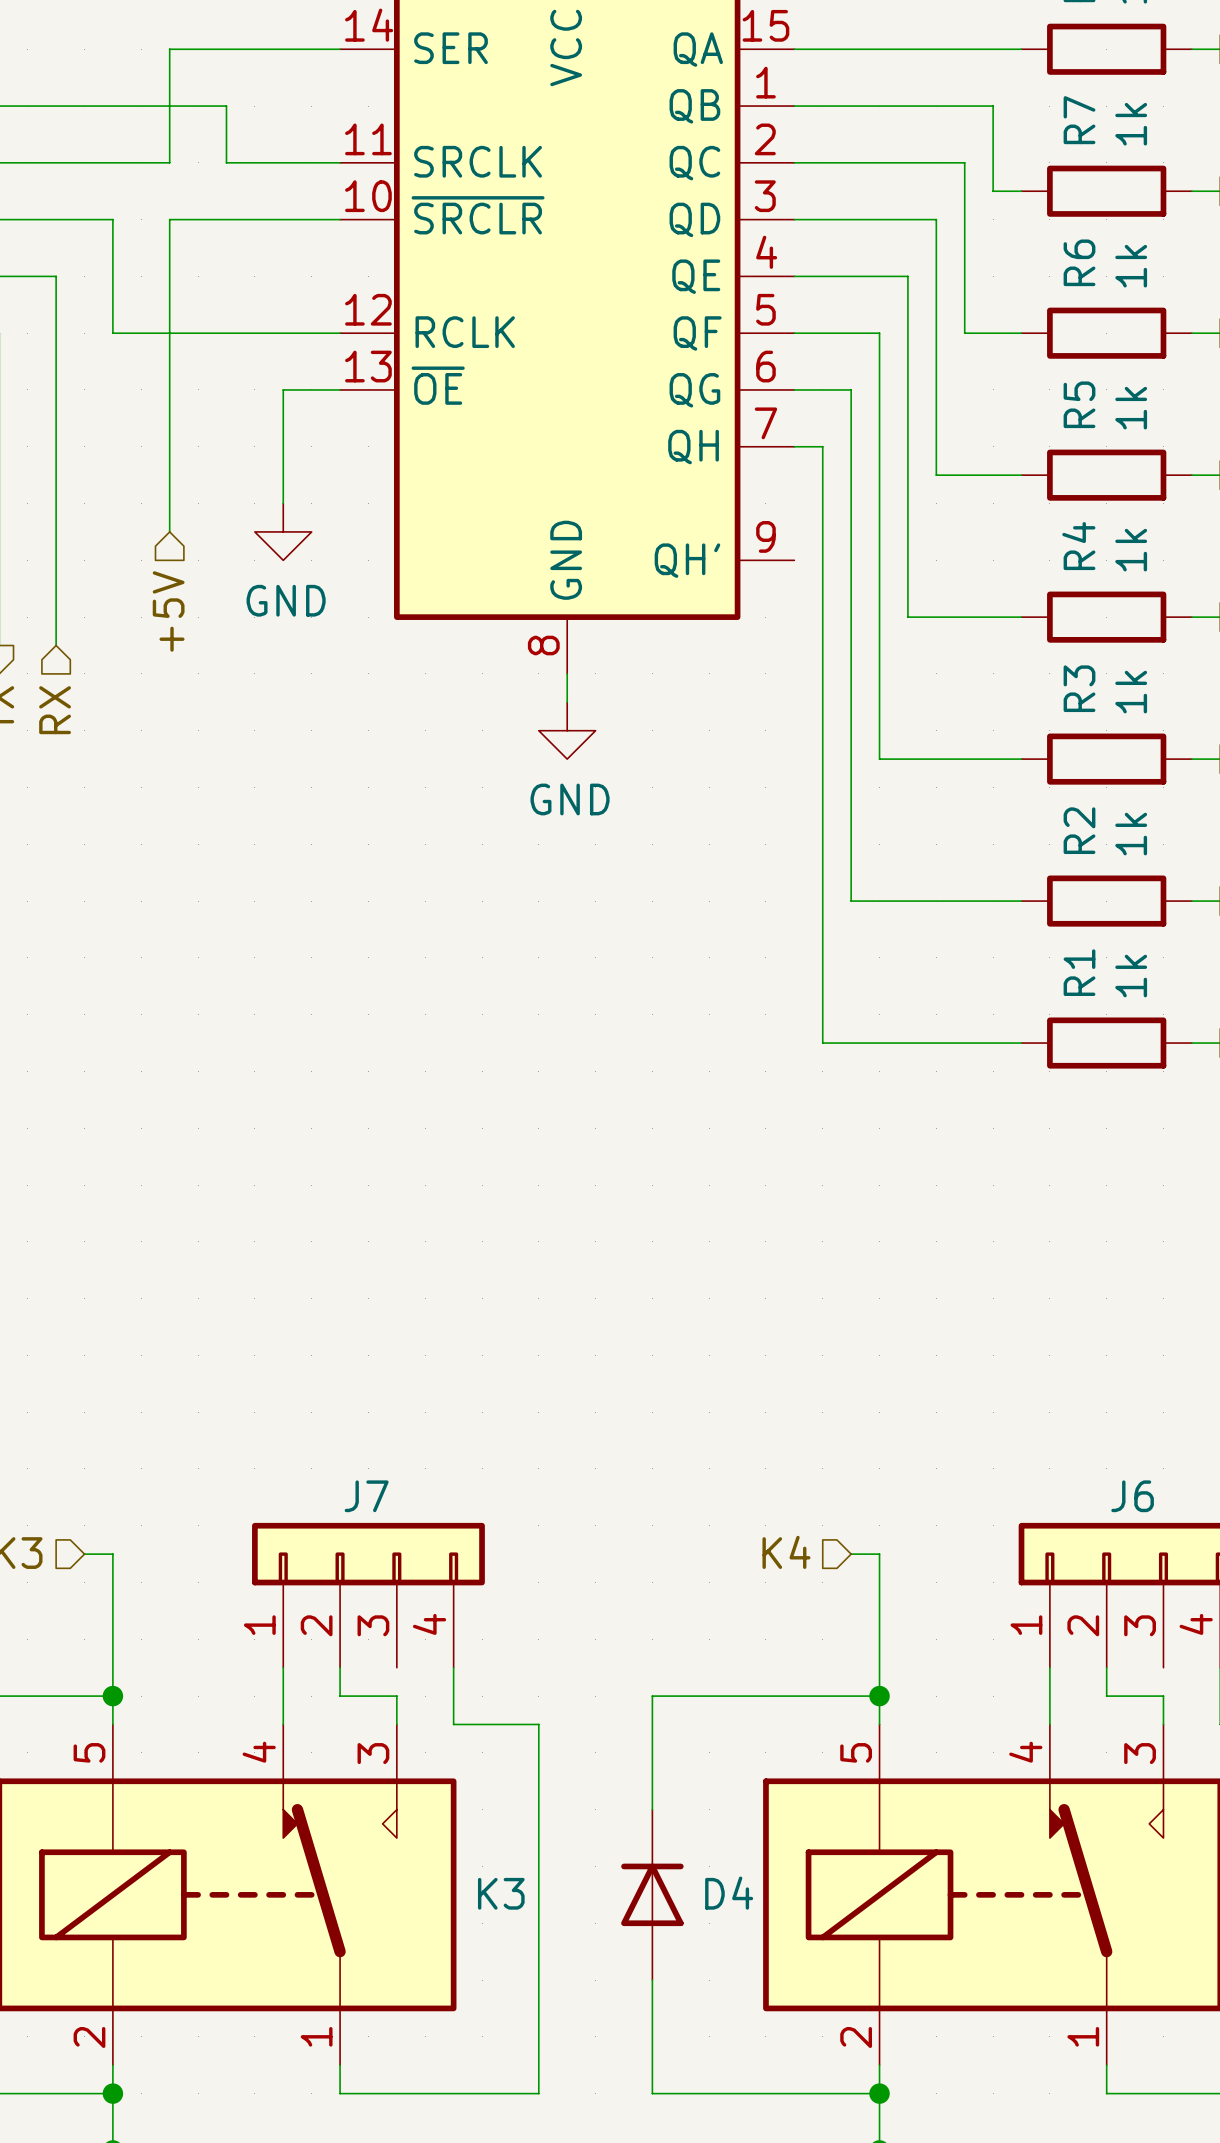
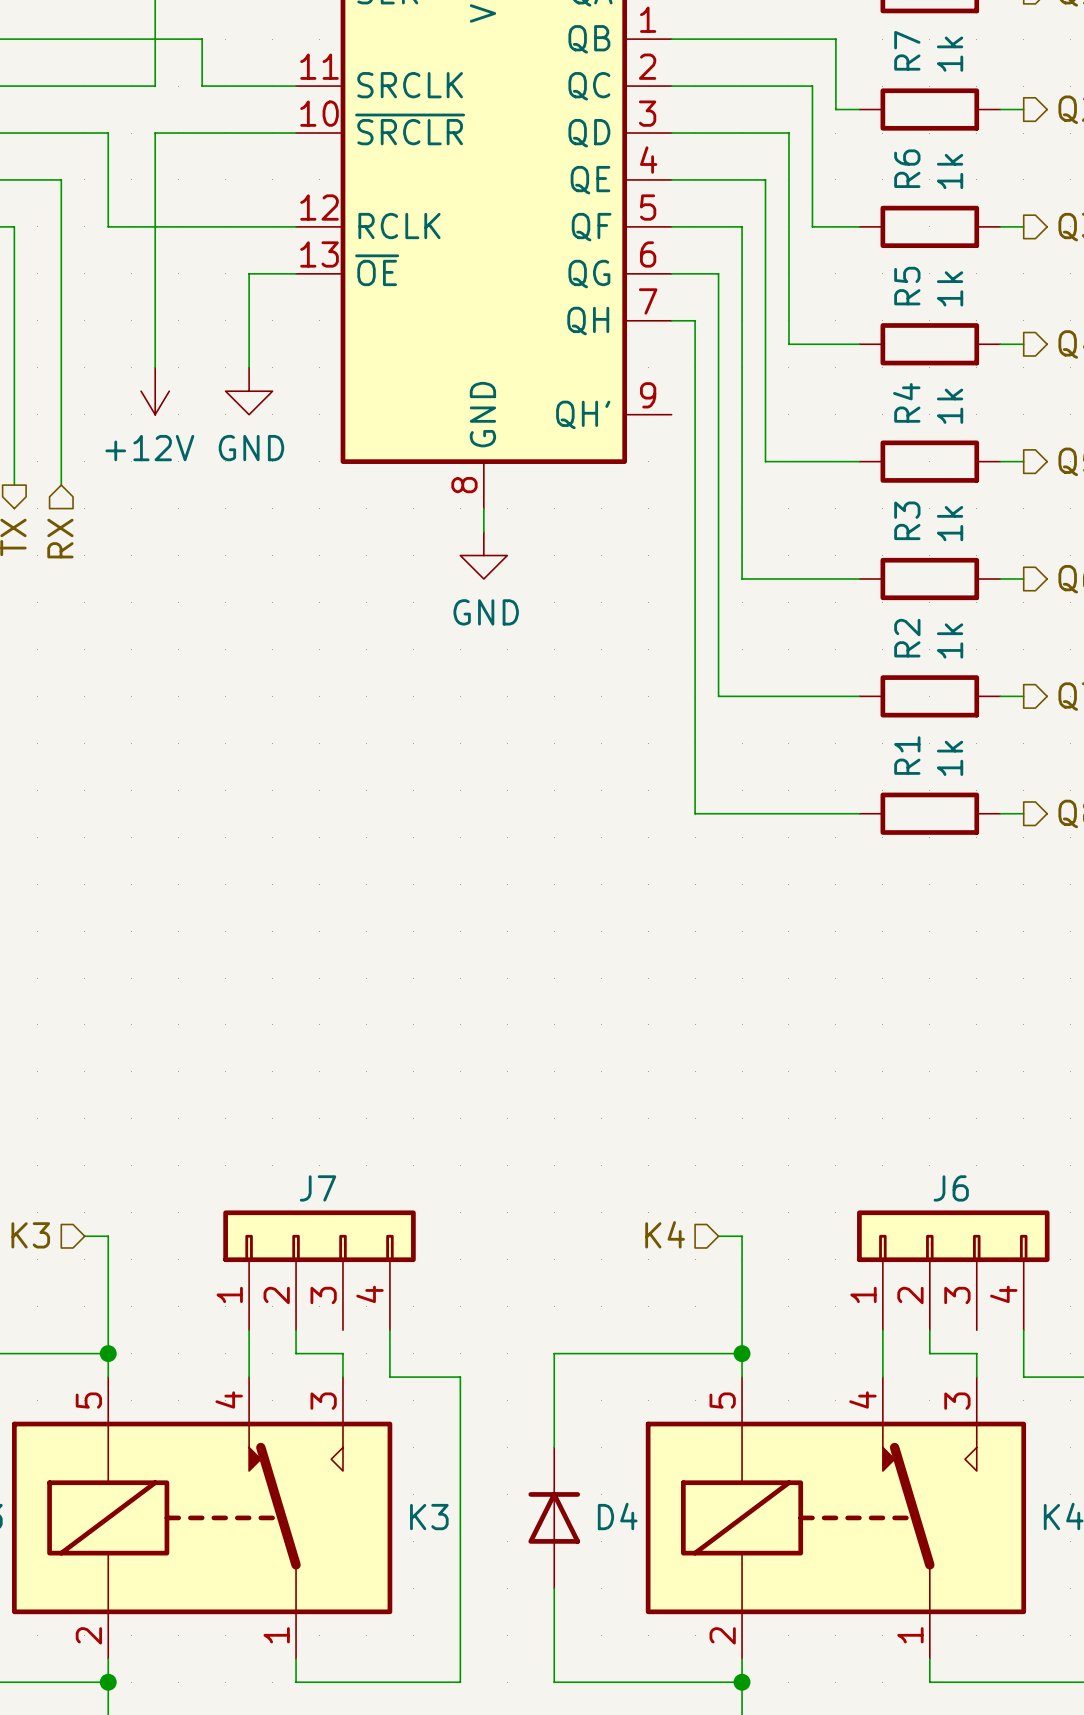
power symbol: none -> +12V (155, 391)
hierarchical label: +5V (168, 611) -> none

